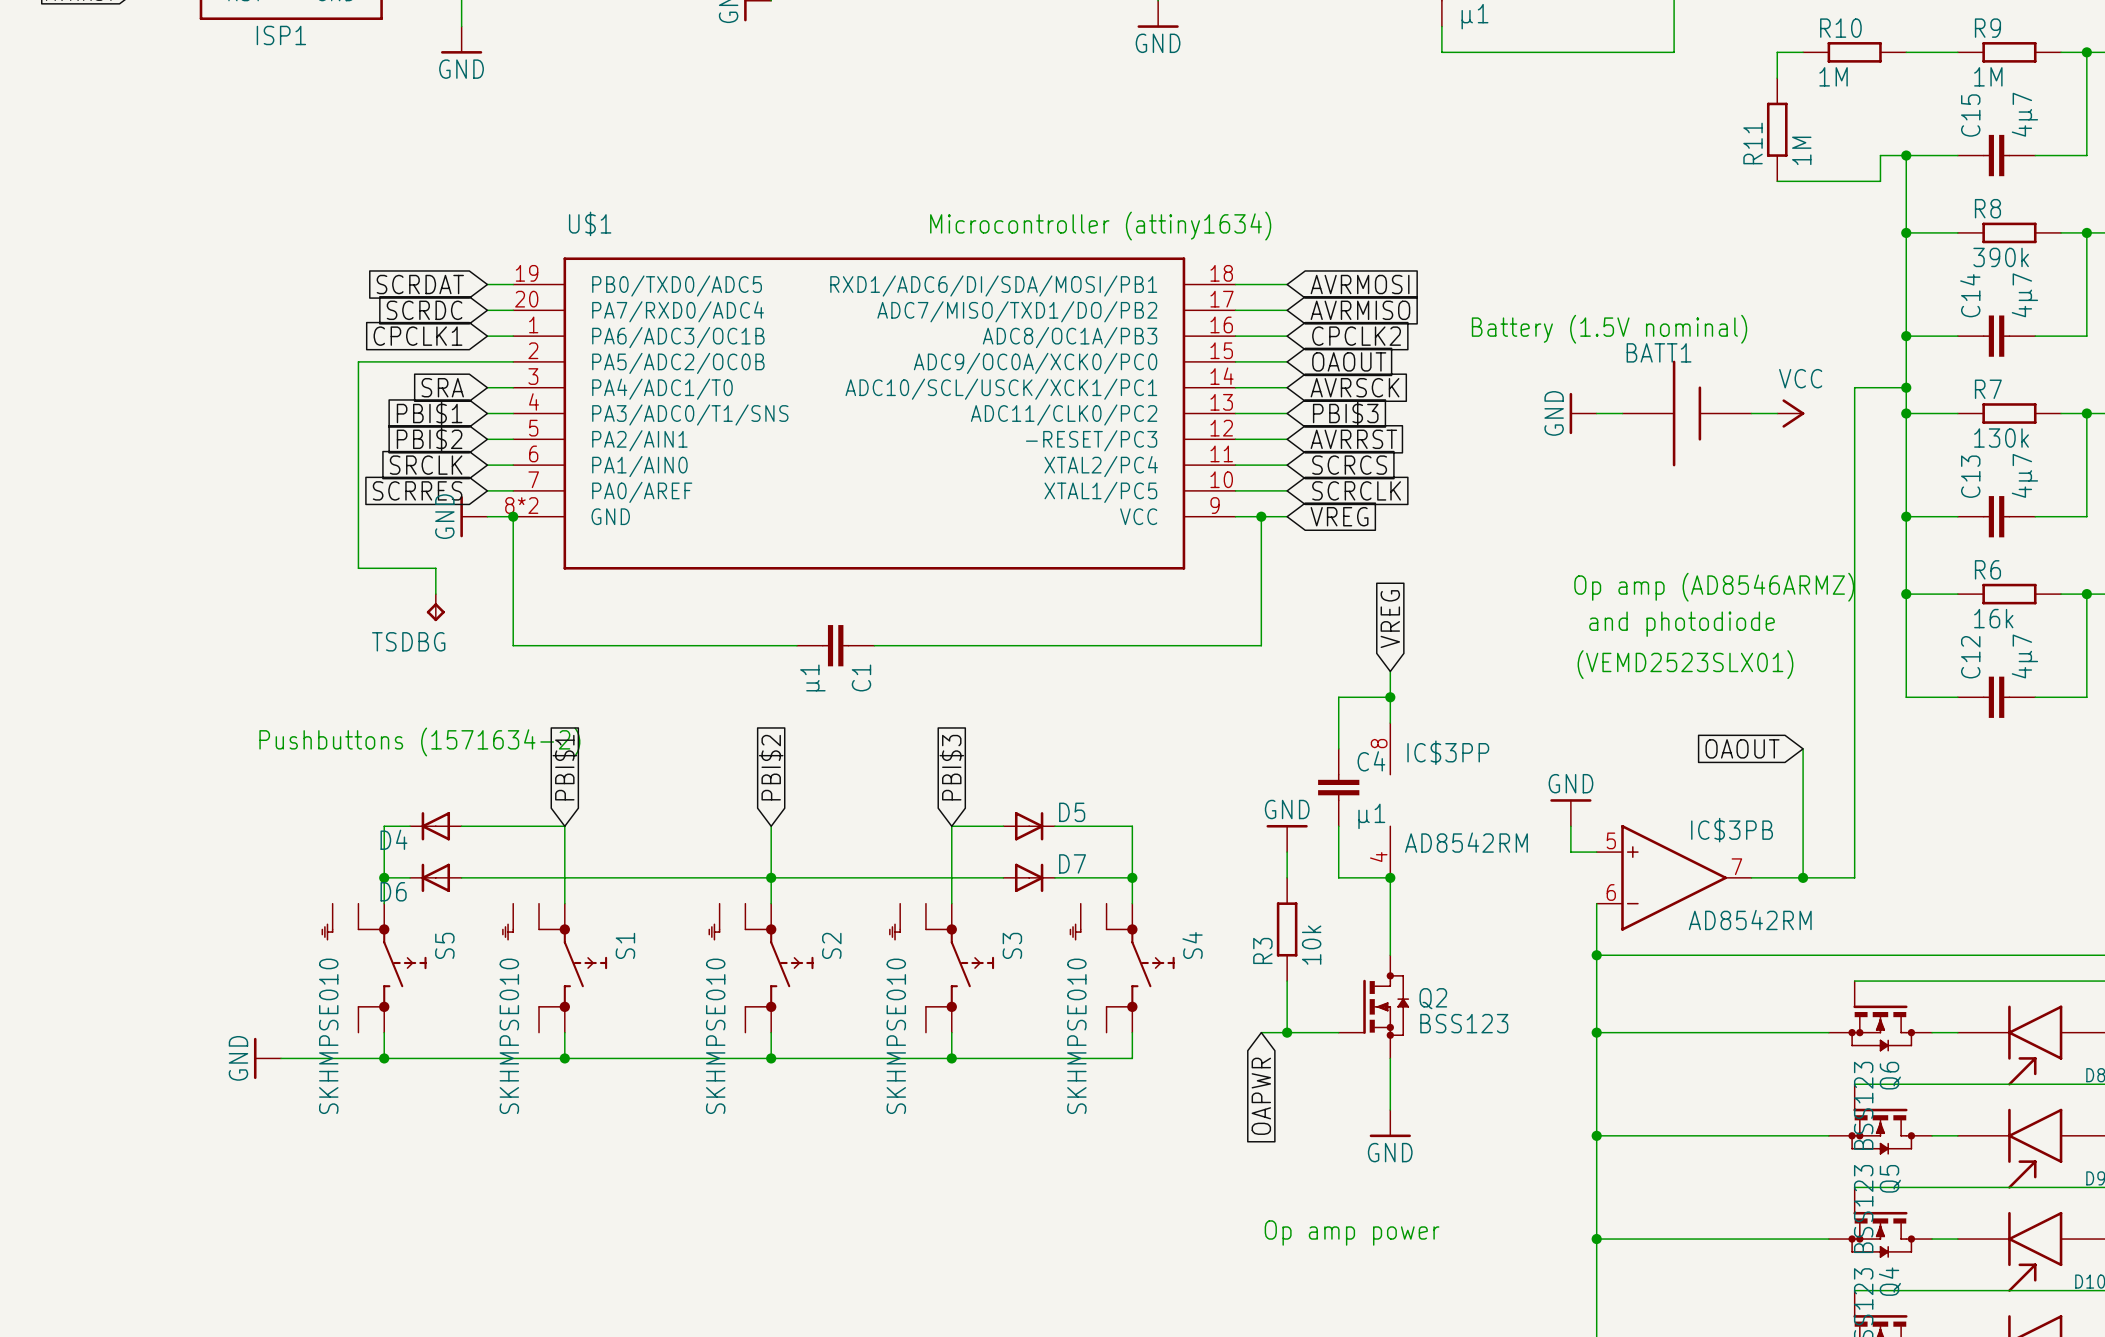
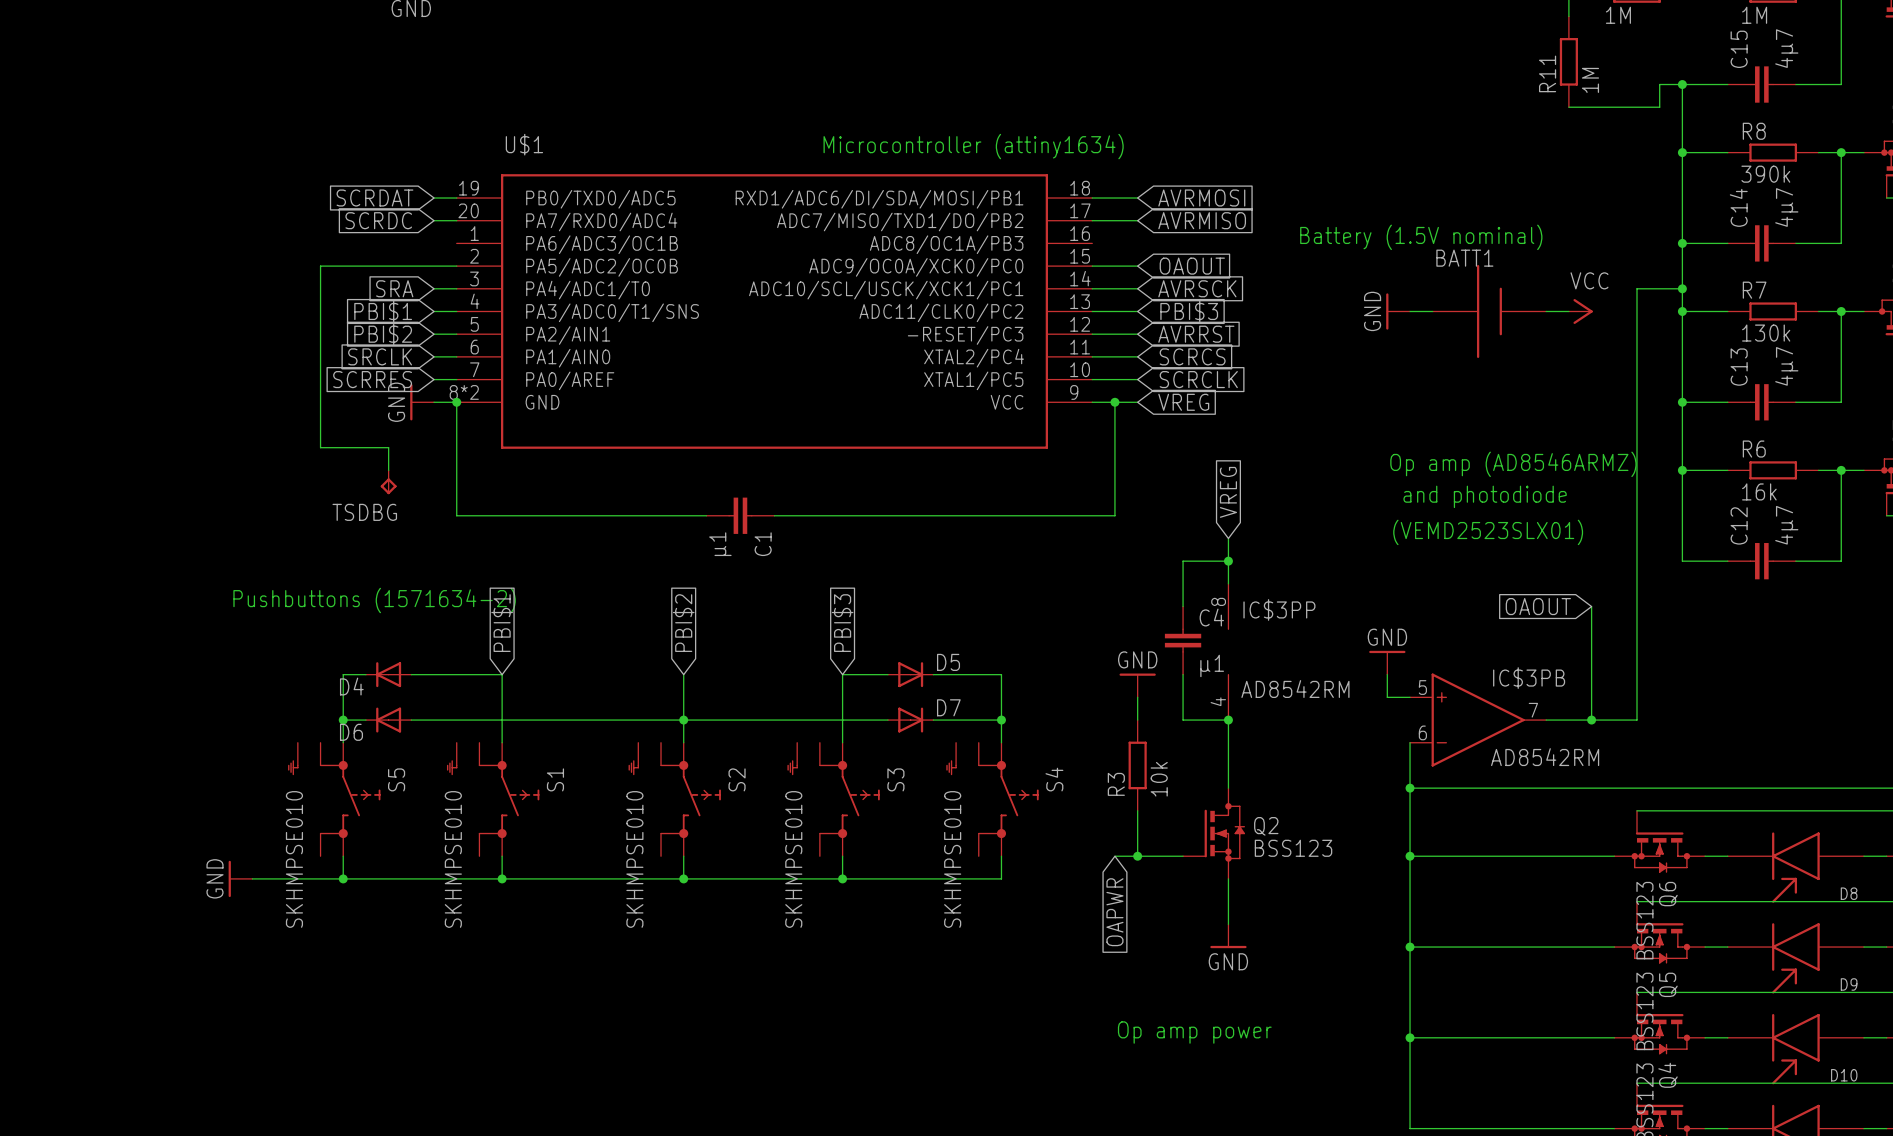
global label: CPCLK1 (417, 336) -> none
wire: (487, 336) (513, 336) -> none
wire: (1235, 336) (1287, 336) -> none
global label: CPCLK2 (1356, 336) -> none

